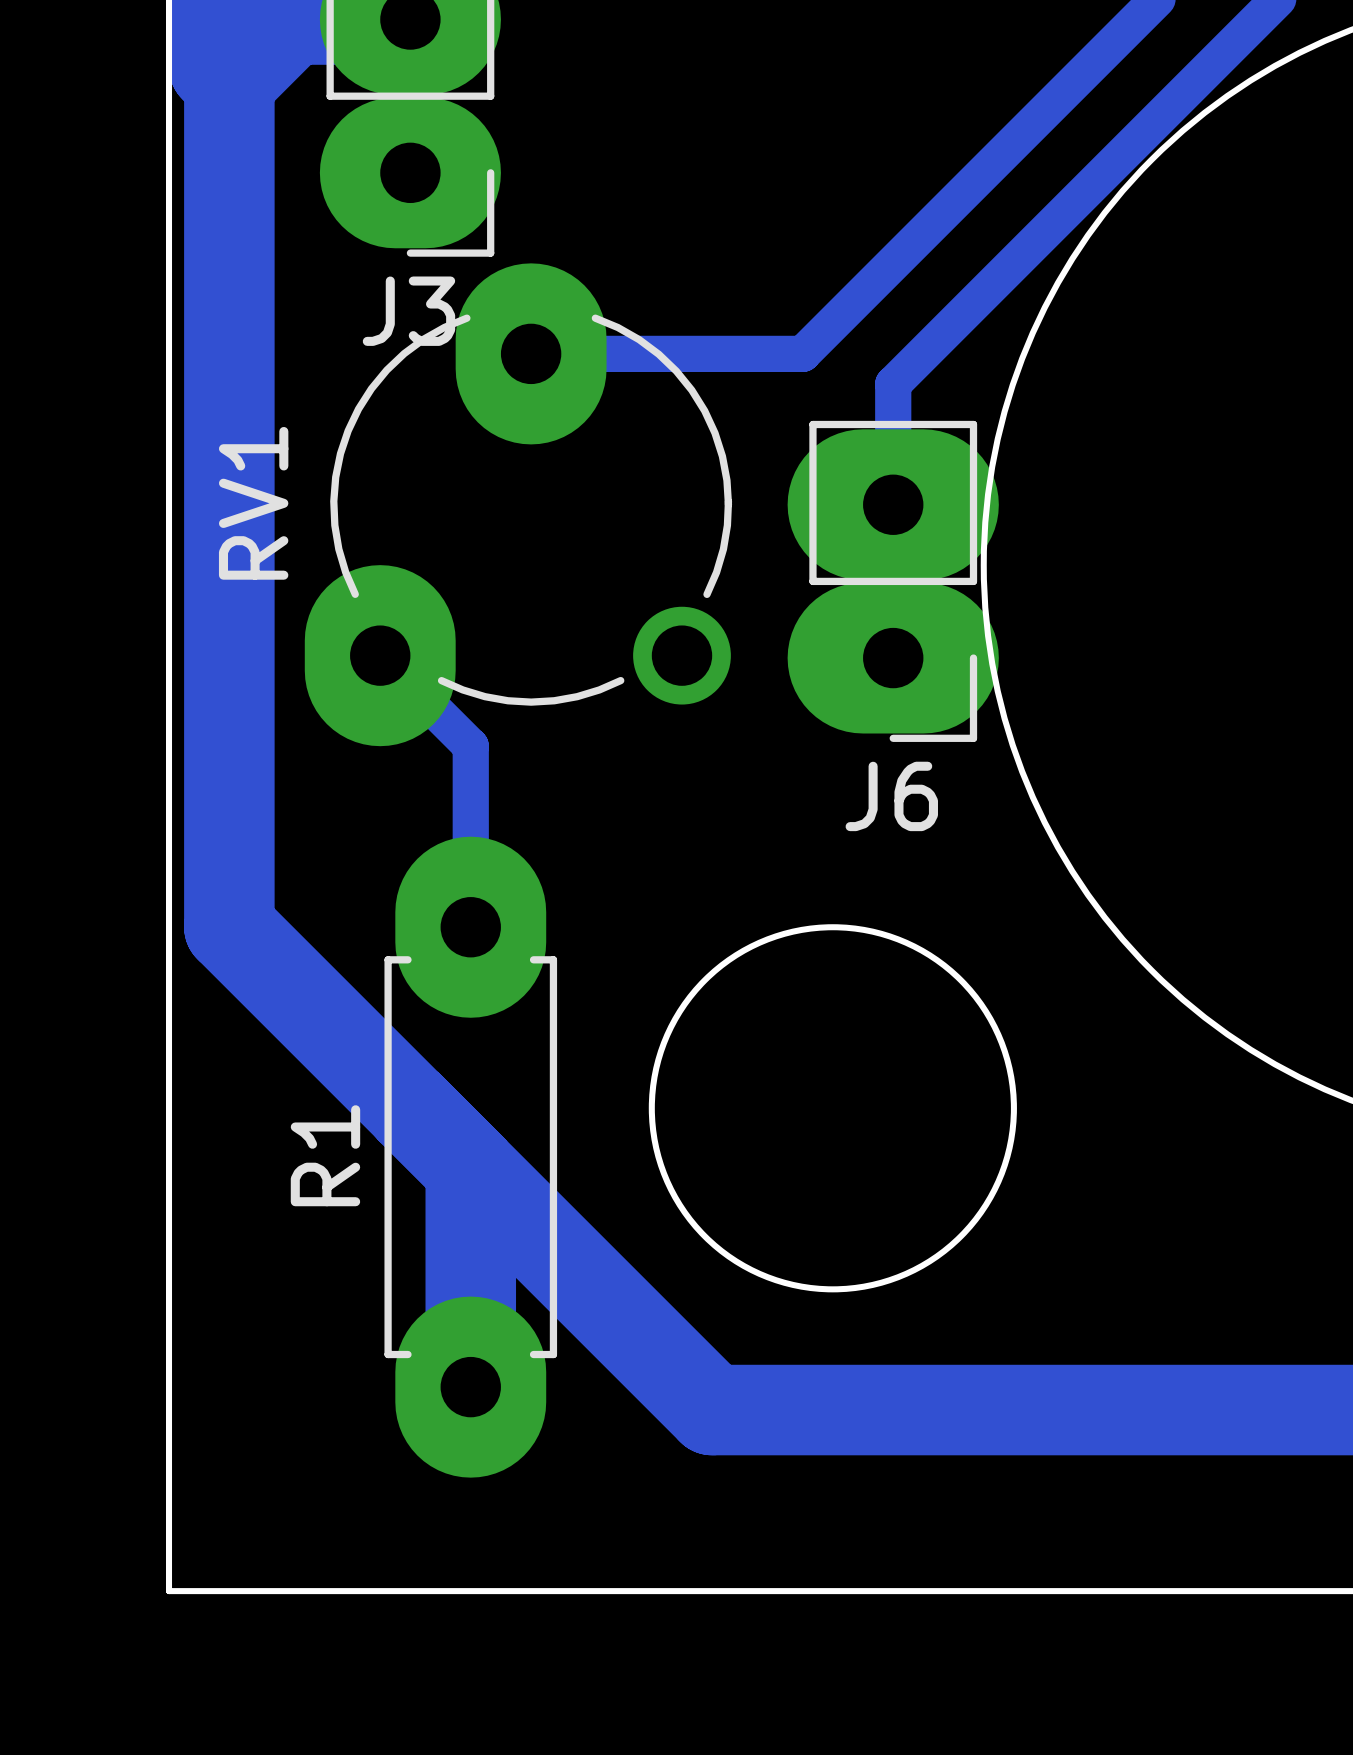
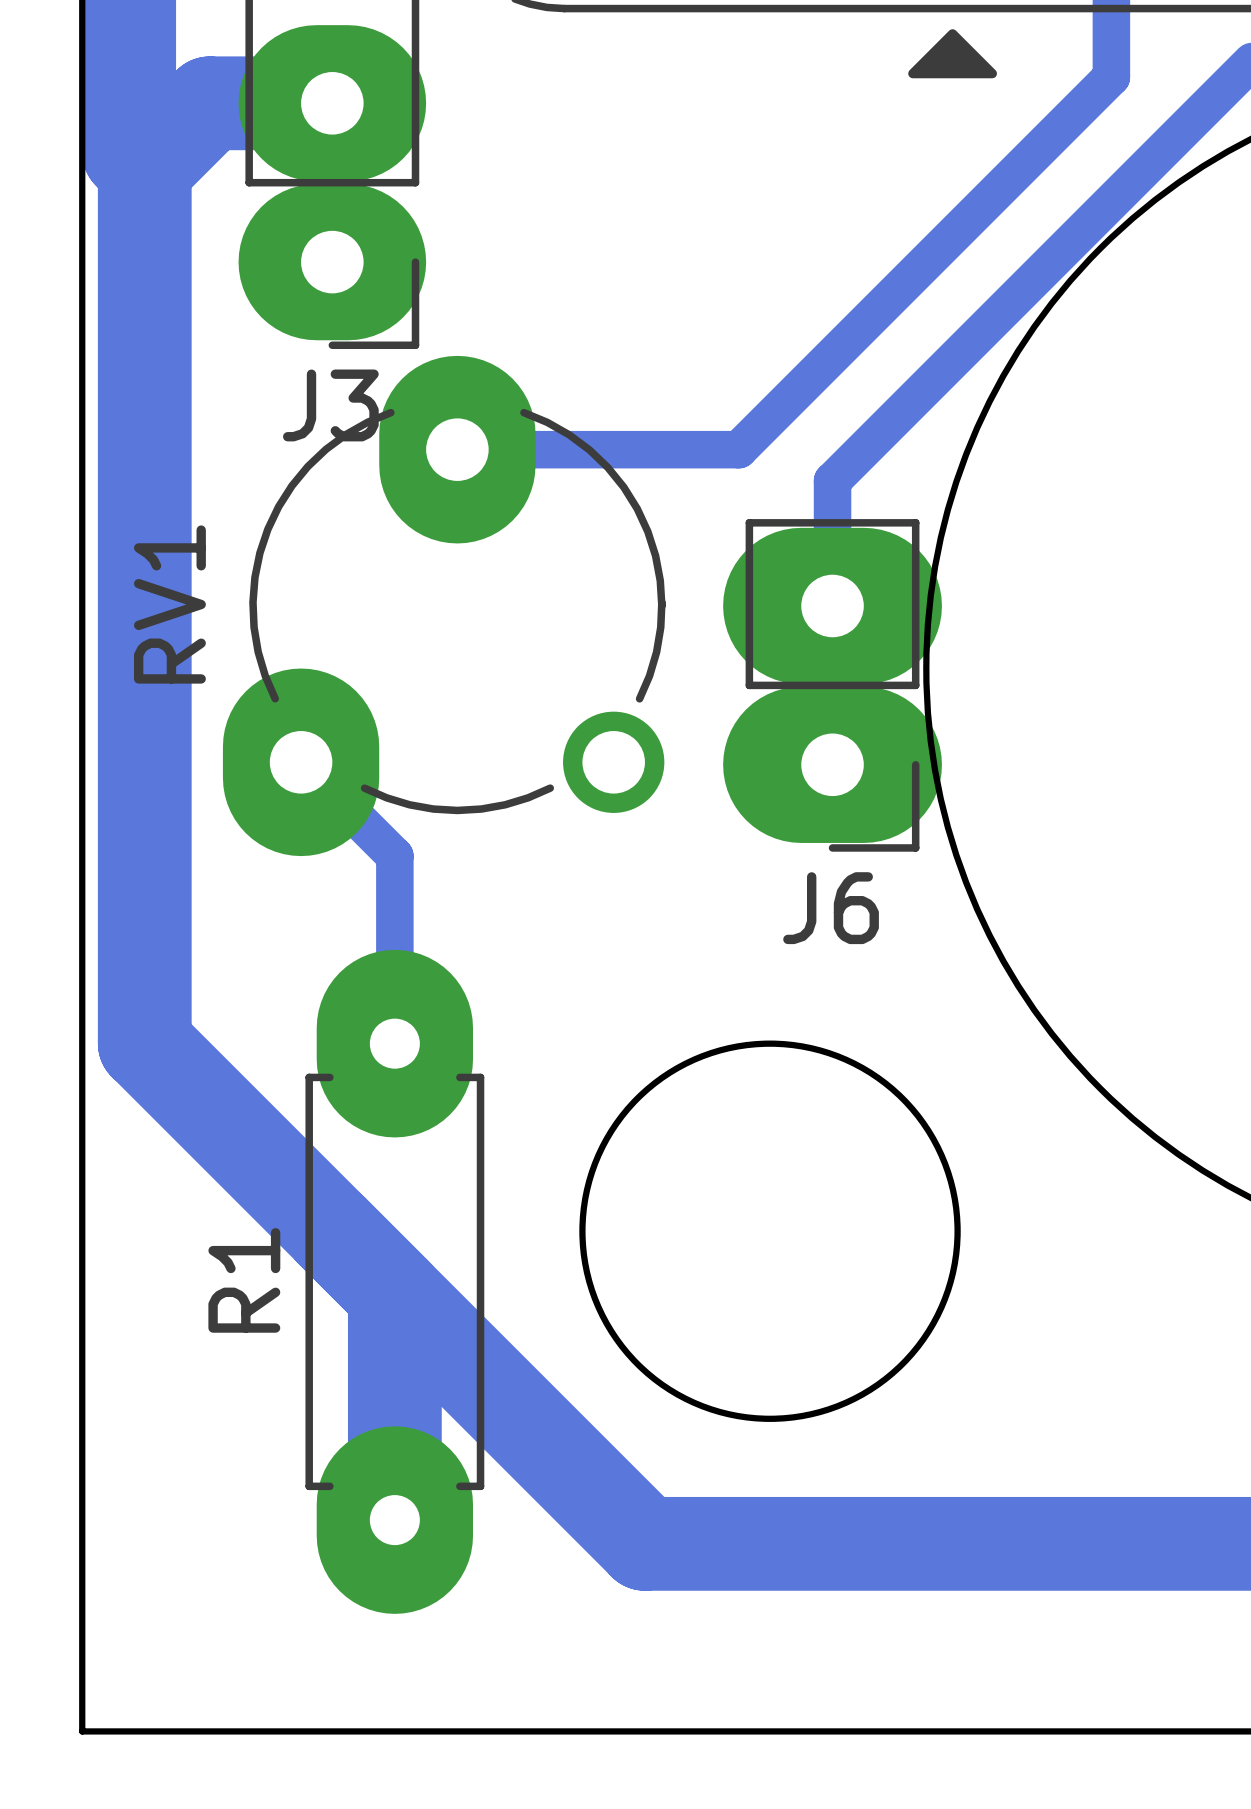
R1 footprint: [384, 836, 558, 1478] -> [305, 949, 485, 1614]

